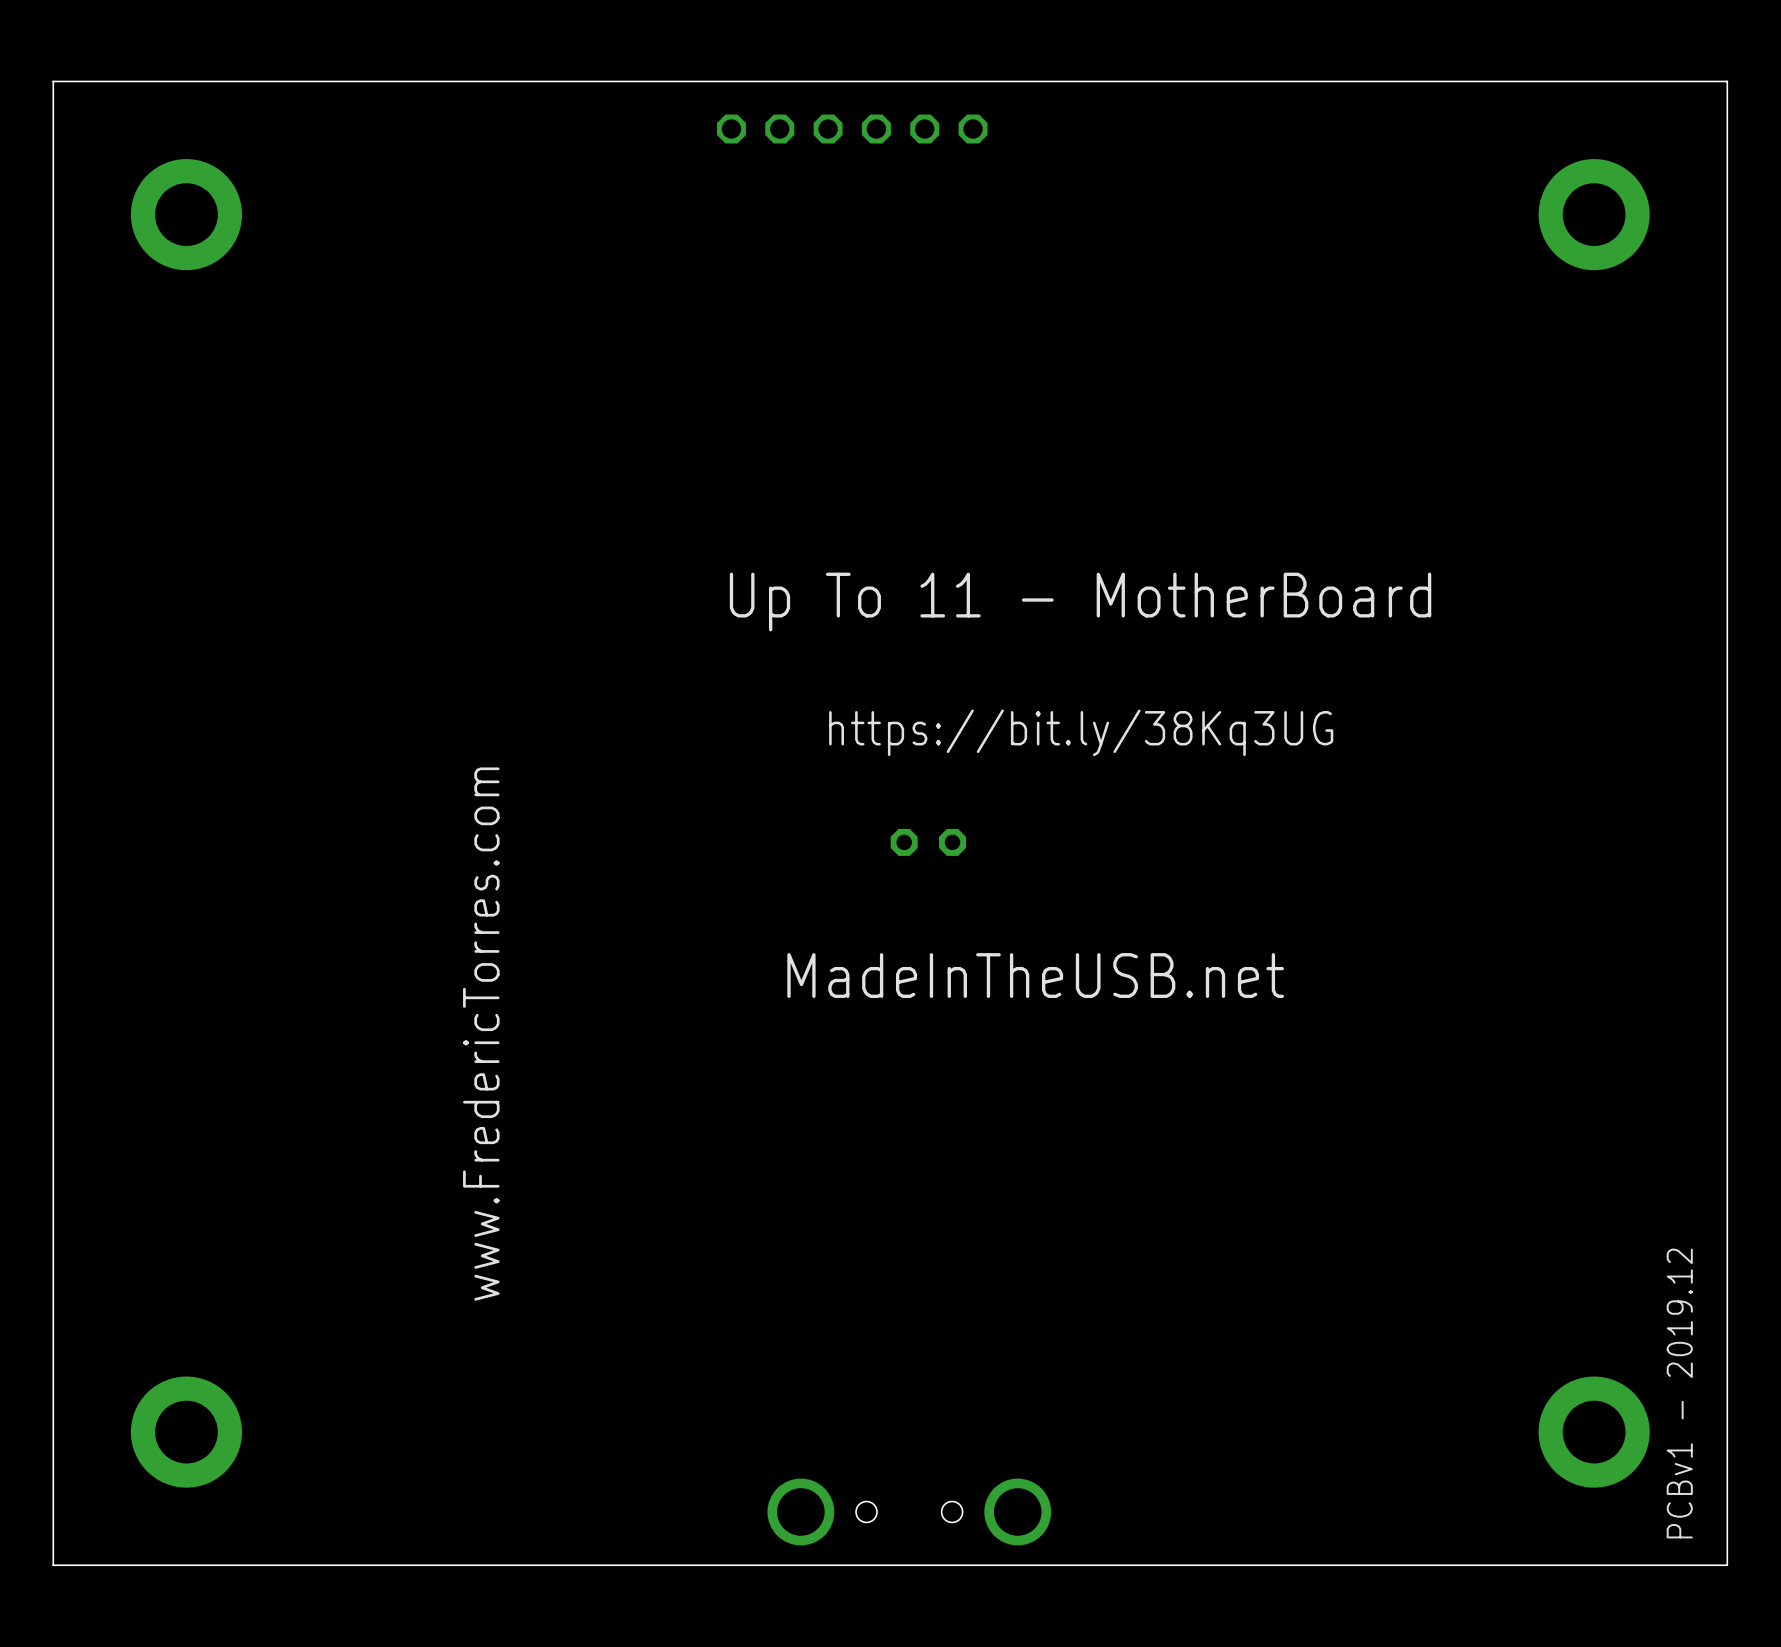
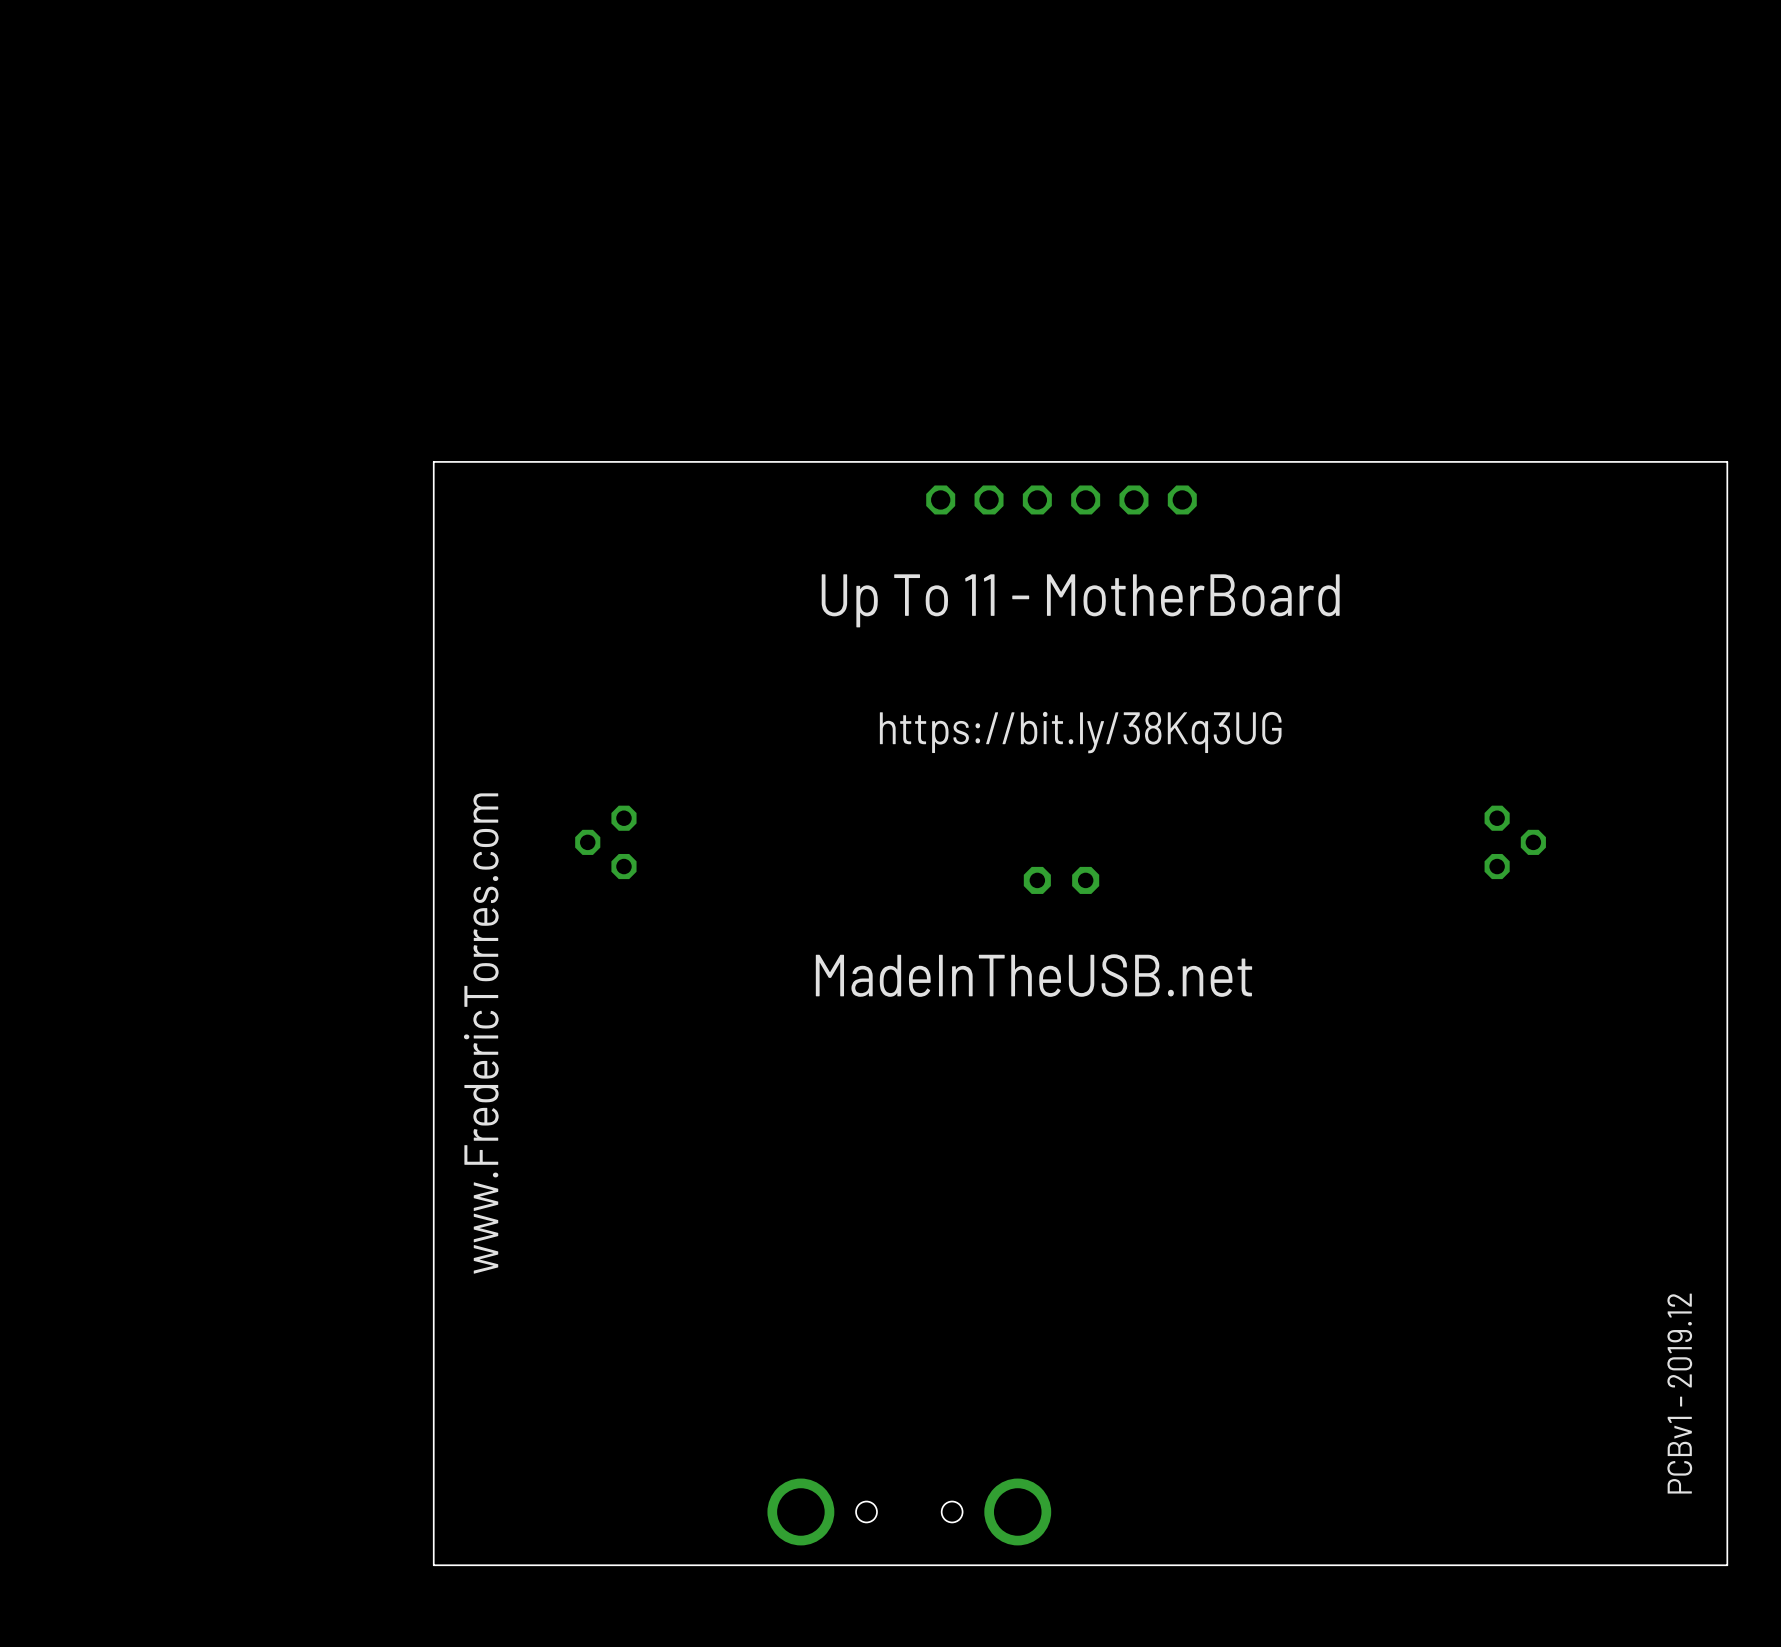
part position: (852, 129) -> (1061, 499)
part: (186, 214) -> none
part: (1594, 214) -> none
board edge: (1727, 461) (1727, 81) (53, 81) (53, 1565) (433, 1565) -> (1727, 461) (433, 461) (433, 1565)
part: none -> (605, 842)
part position: (928, 842) -> (1061, 880)
part: none -> (1515, 842)
part: (186, 1432) -> none
part: (1594, 1432) -> none

